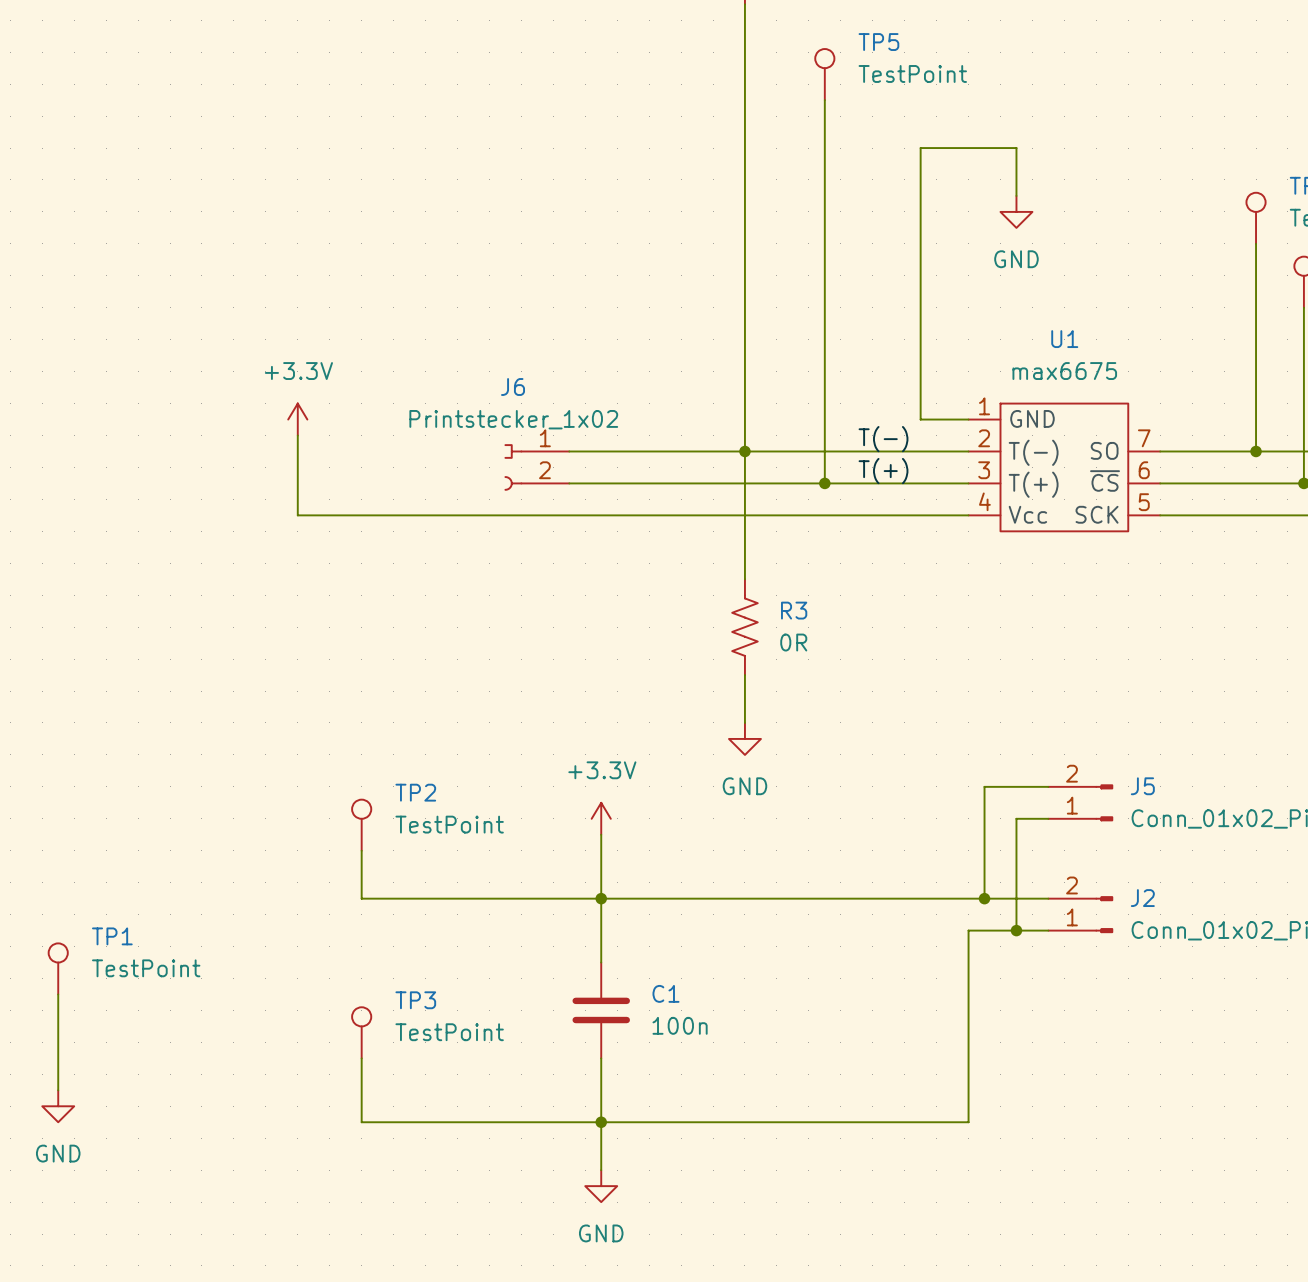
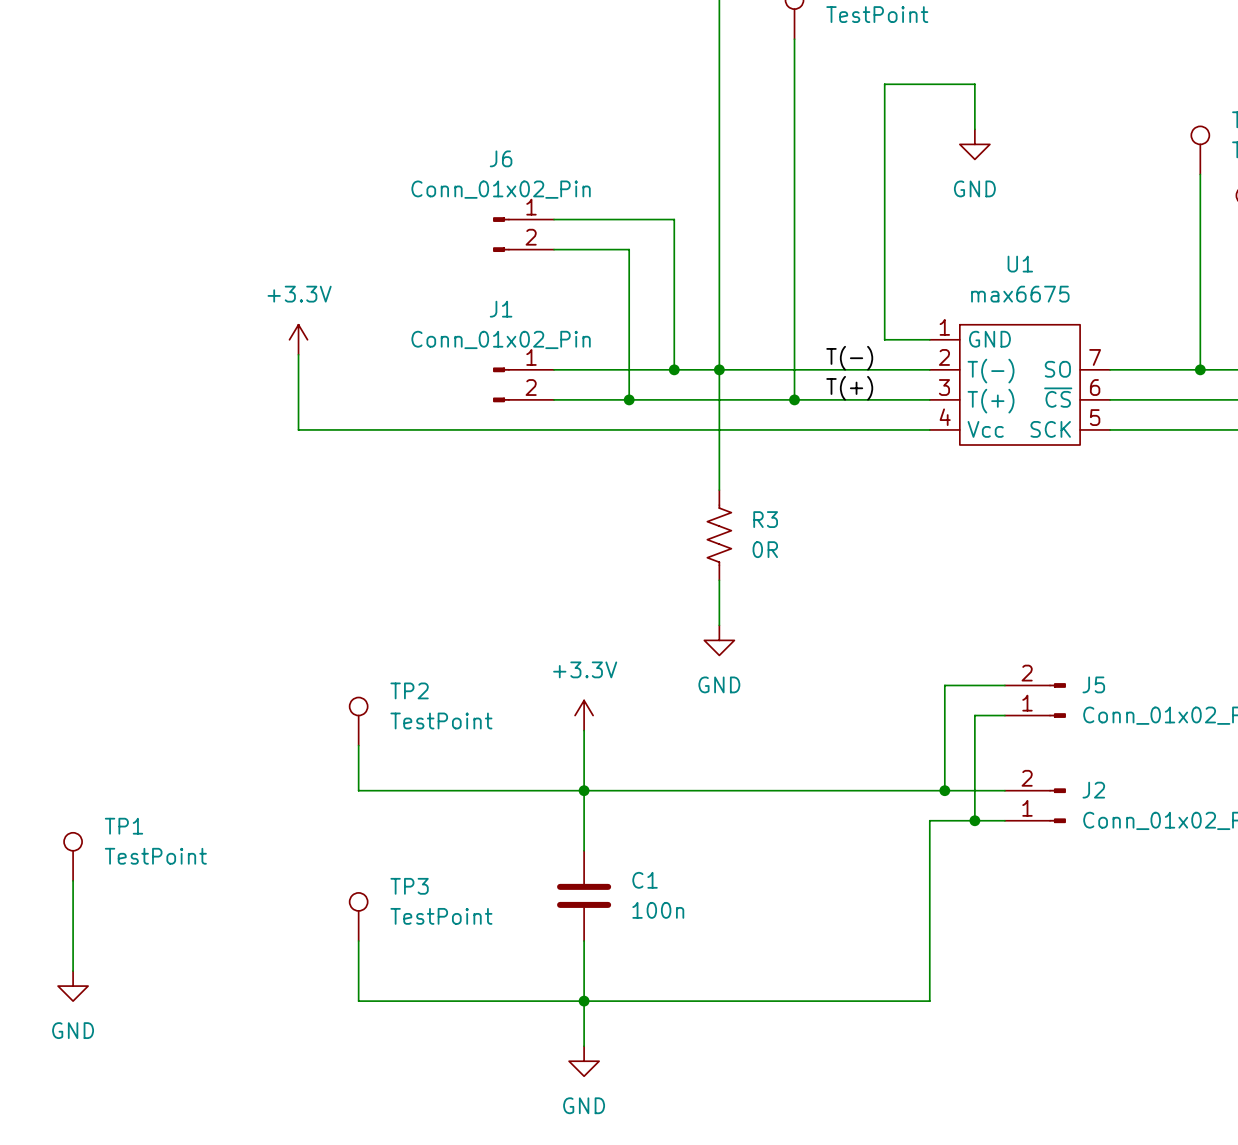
wire: none -> (554, 219) (674, 219) (674, 369)
wire: none -> (554, 249) (629, 249) (629, 399)
J6 value: Printstecker_1x02 (513, 419) -> Conn_01x02_Pin (501, 189)
J6 symbol: [504, 444, 570, 491] -> [493, 217, 555, 253]
junction: none -> (674, 369)
J1: none -> Conn_01x02_Pin (523, 384)
junction: none -> (629, 399)

